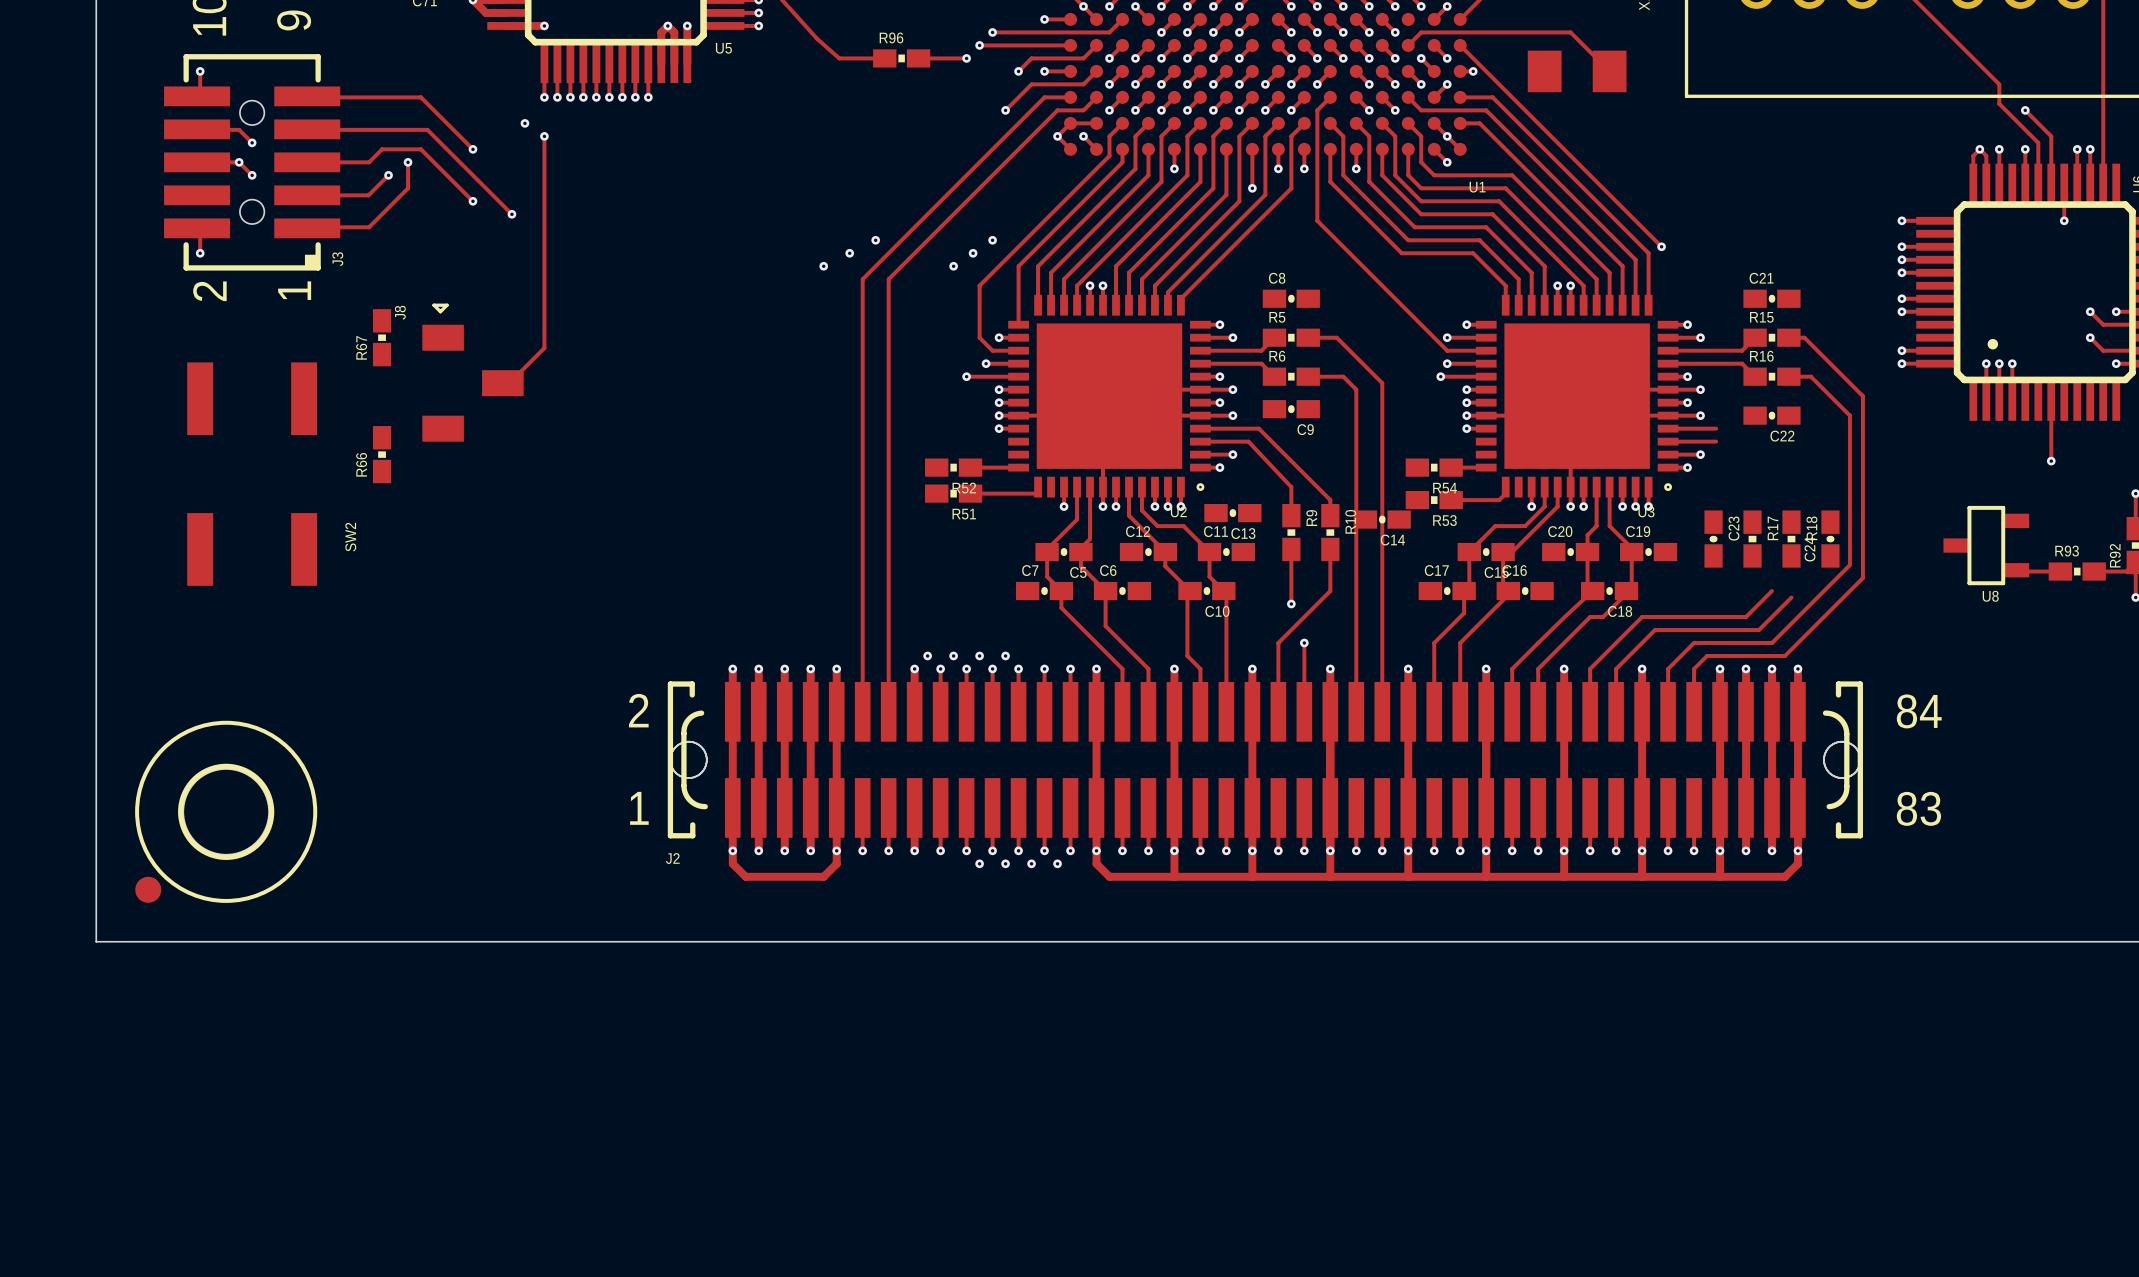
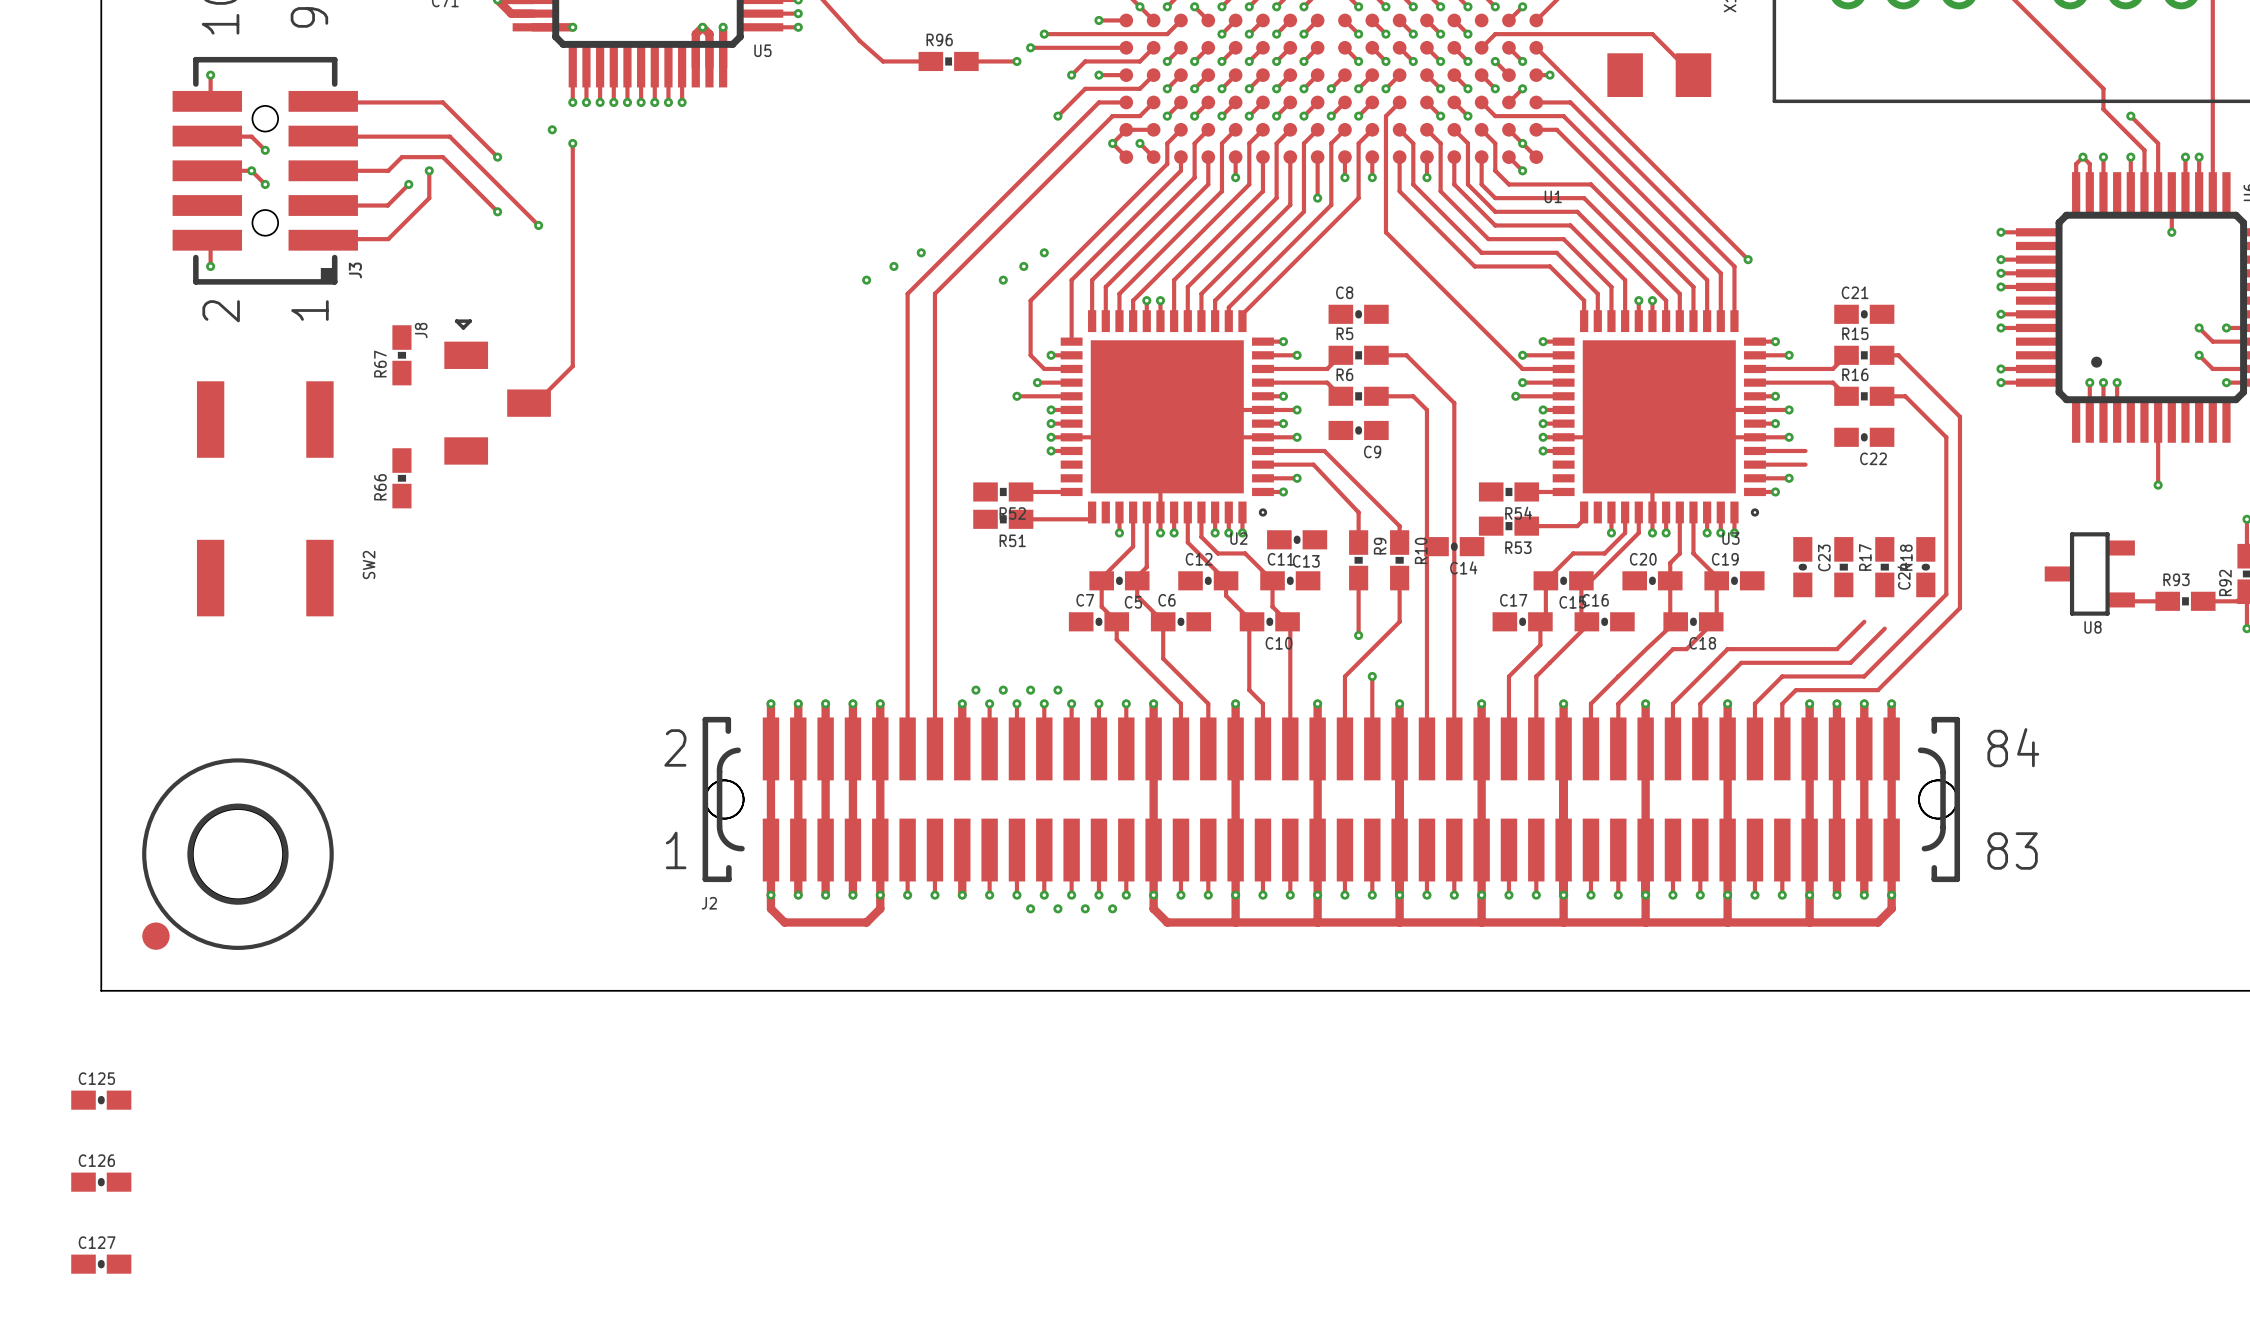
C125: none -> (101, 1100)
C126: none -> (101, 1182)
C127: none -> (101, 1264)

